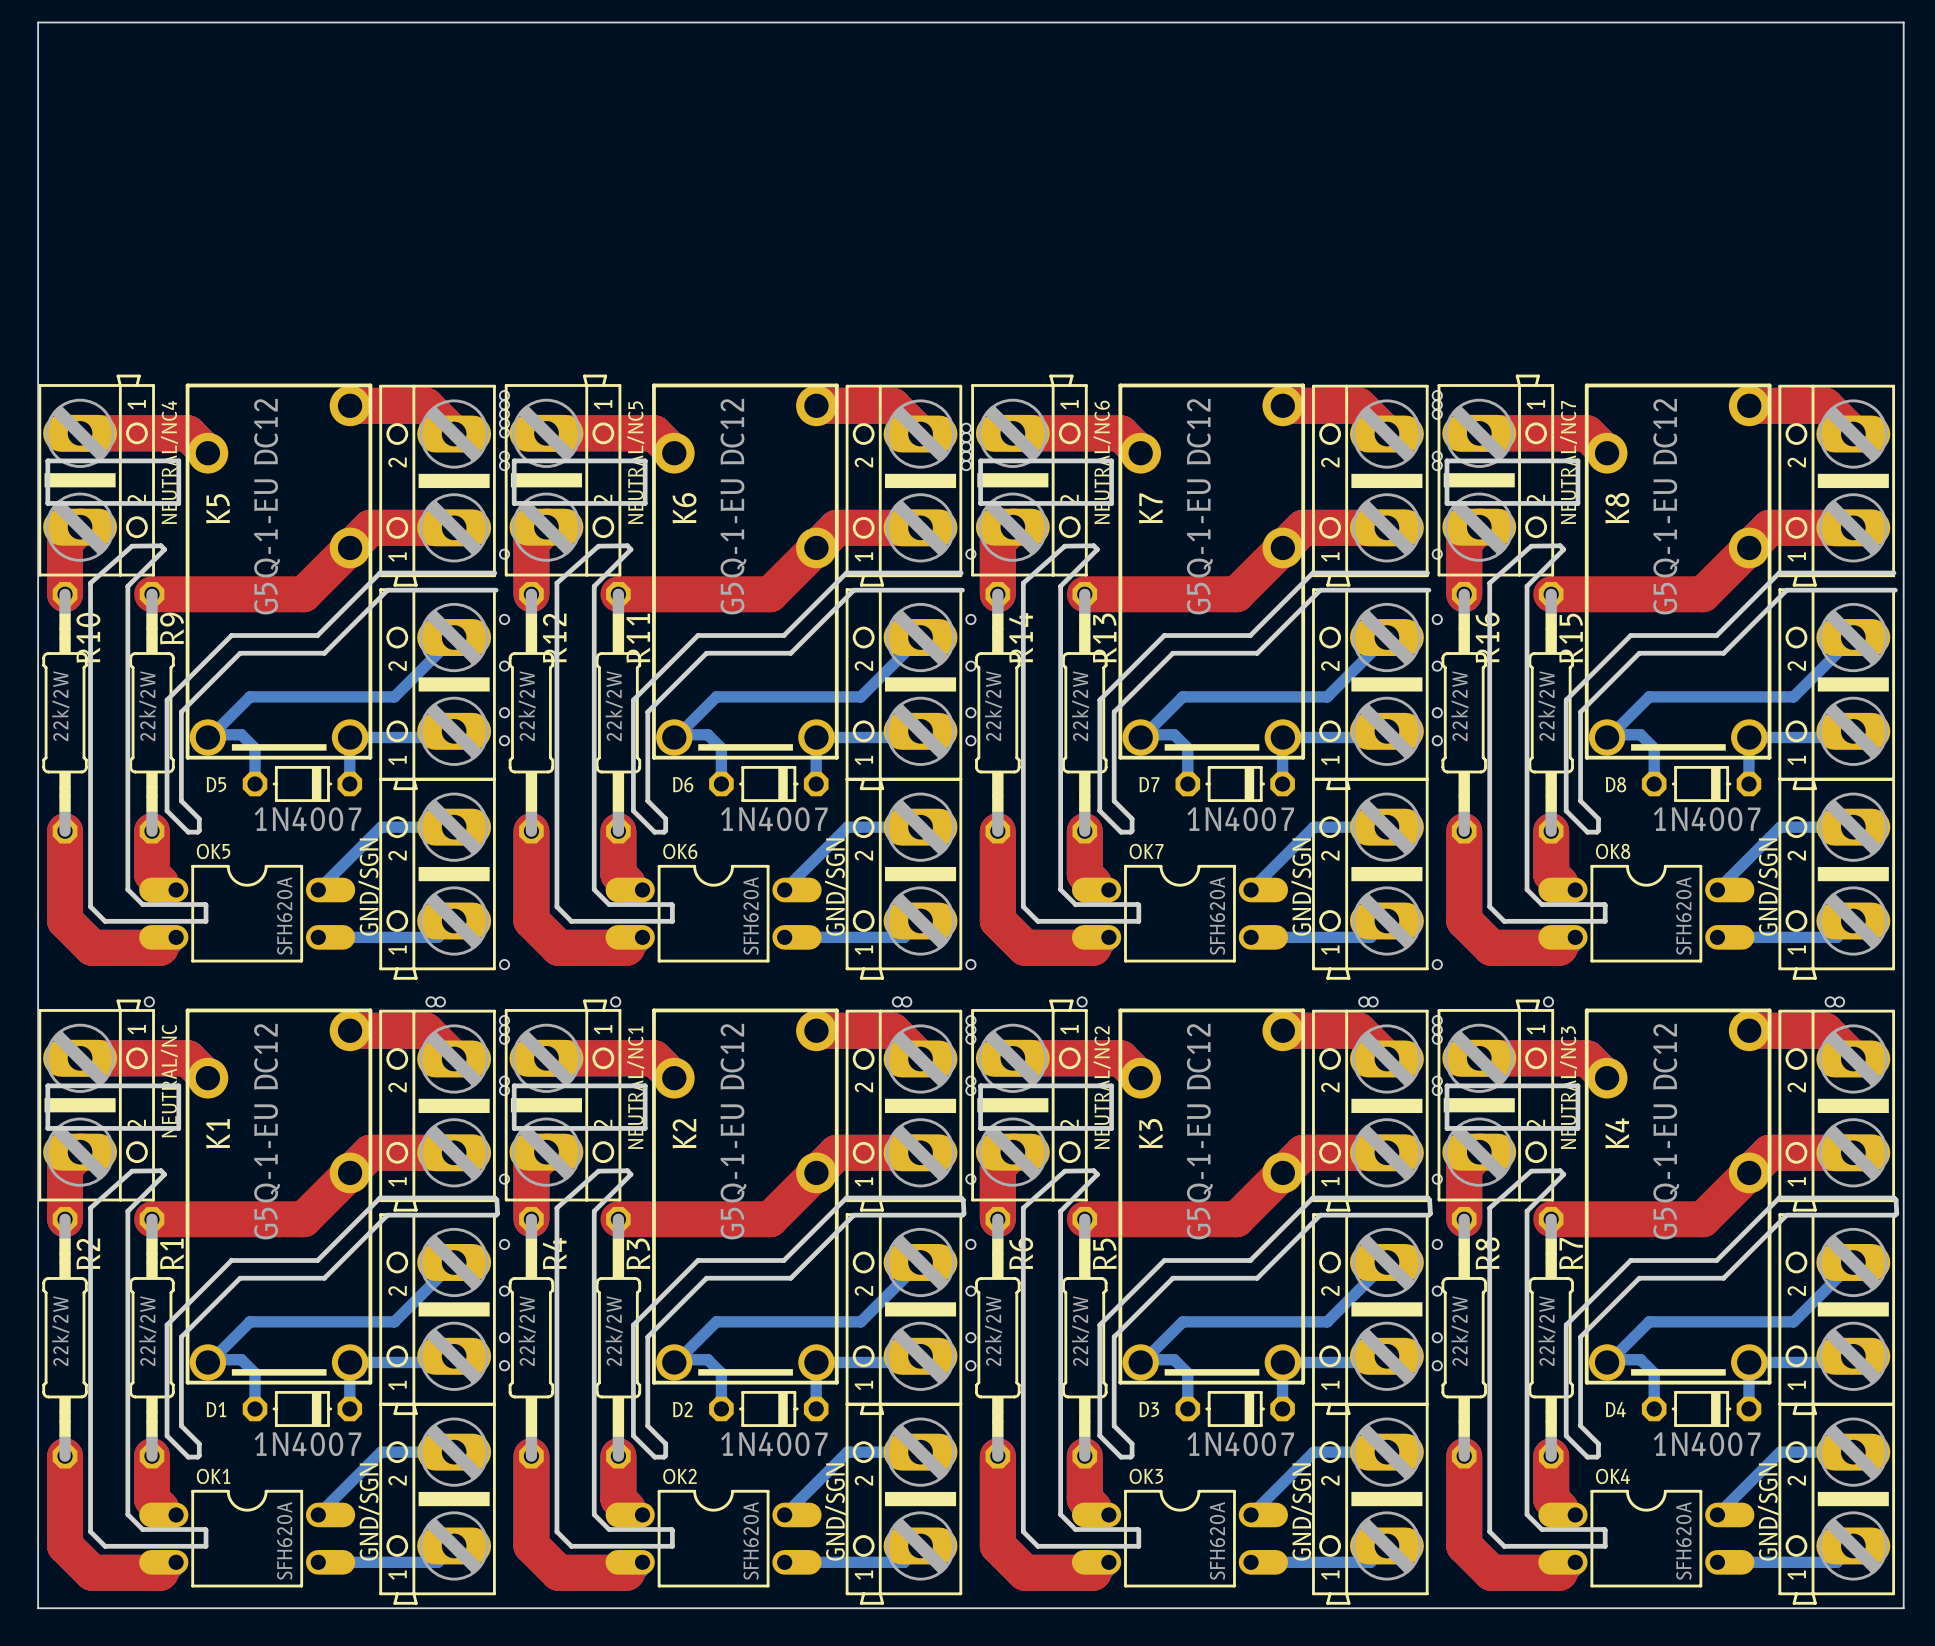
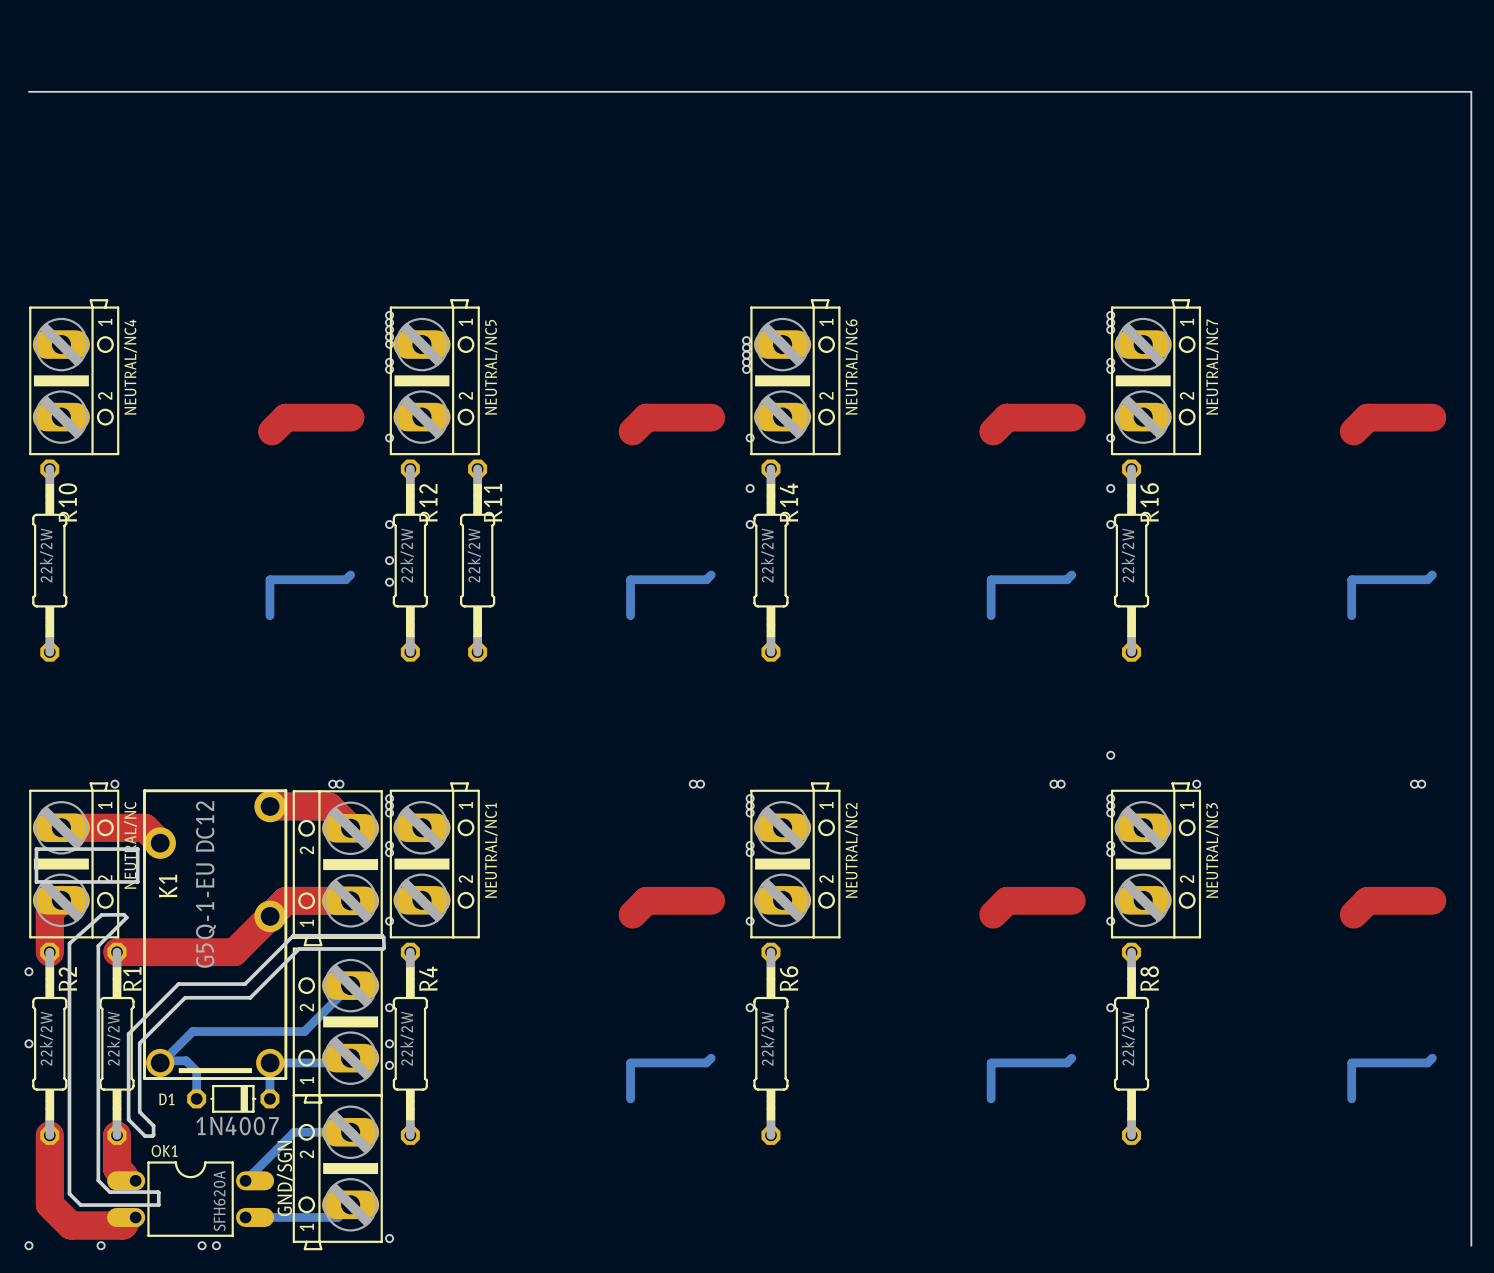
board edge: (1903, 106) (1903, 22) (38, 22) (38, 1608) (1903, 1608) (1903, 1598) -> (1471, 91) (28, 91)
top track: (350, 405) (426, 405) (454, 433) -> none
top track: (816, 405) (892, 405) (920, 433) -> none
top track: (1282, 405) (1358, 405) (1386, 433) -> none
top track: (1749, 405) (1825, 405) (1853, 433) -> none
top track: (80, 433) (187, 433) (206, 452) -> none
top track: (546, 433) (654, 433) (673, 452) -> none
top track: (1012, 433) (1120, 433) (1139, 452) -> none
top track: (1479, 433) (1586, 433) (1606, 452) -> none
board edge: (47, 460) (47, 503) (178, 503) (178, 460) (47, 460) -> none
board edge: (514, 460) (514, 503) (645, 503) (645, 460) (514, 460) -> none
board edge: (980, 460) (980, 503) (1111, 503) (1111, 460) (980, 460) -> none
board edge: (1446, 460) (1446, 503) (1577, 503) (1577, 460) (1446, 460) -> none
part: (437, 485) -> none
part: (903, 485) -> none
part: (1370, 485) -> none
part: (1836, 485) -> none
top track: (81, 526) (65, 542) (65, 594) -> none
top track: (547, 526) (531, 542) (531, 594) -> none
top track: (1013, 526) (997, 542) (997, 594) -> none
top track: (1480, 526) (1464, 542) (1464, 594) -> none
board edge: (161, 545) (132, 546) (90, 583) (90, 906) (105, 921) (206, 921) (205, 904) (142, 904) (127, 889) (127, 586) (164, 549) (161, 545) -> none
board edge: (627, 545) (598, 546) (556, 583) (556, 906) (571, 921) (672, 921) (671, 904) (609, 904) (594, 889) (594, 586) (630, 549) (627, 545) -> none
board edge: (1093, 545) (1064, 546) (1023, 583) (1023, 906) (1037, 921) (1138, 921) (1138, 904) (1075, 904) (1060, 889) (1060, 586) (1097, 549) (1093, 545) -> none
board edge: (1560, 545) (1531, 546) (1489, 583) (1489, 906) (1504, 921) (1605, 921) (1604, 904) (1541, 904) (1527, 889) (1527, 586) (1563, 549) (1560, 545) -> none
top track: (350, 547) (303, 594) (152, 594) -> none
top track: (816, 547) (770, 594) (618, 594) -> none
top track: (1282, 547) (1236, 594) (1084, 594) -> none
top track: (1749, 547) (1702, 594) (1551, 594) -> none
K5: G5Q-1-EU DC12 (278, 571) -> none
K6: G5Q-1-EU DC12 (745, 571) -> none
K7: G5Q-1-EU DC12 (1211, 571) -> none
K8: G5Q-1-EU DC12 (1678, 571) -> none
board edge: (494, 573) (380, 573) (317, 635) (231, 635) (167, 700) (167, 810) (188, 832) (199, 830) (199, 818) (181, 800) (181, 712) (240, 653) (324, 653) (387, 590) (496, 590) -> none
board edge: (961, 573) (846, 573) (783, 635) (697, 635) (633, 700) (633, 810) (654, 832) (665, 830) (665, 818) (647, 800) (647, 712) (706, 653) (790, 653) (853, 590) (962, 590) -> none
board edge: (1427, 573) (1312, 573) (1250, 635) (1164, 635) (1099, 700) (1099, 810) (1121, 832) (1132, 830) (1132, 818) (1114, 800) (1114, 712) (1172, 653) (1257, 653) (1320, 590) (1428, 590) -> none
board edge: (1893, 573) (1779, 573) (1716, 635) (1630, 635) (1566, 700) (1566, 810) (1587, 832) (1598, 830) (1598, 818) (1580, 800) (1580, 712) (1639, 653) (1723, 653) (1786, 590) (1895, 590) -> none
hole: (504, 619) -> none
bottom track: (453, 637) (394, 696) (250, 696) (218, 728) (218, 734) -> none
bottom track: (920, 637) (860, 696) (716, 696) (685, 728) (685, 734) -> none
bottom track: (1386, 637) (1327, 696) (1182, 696) (1151, 728) (1151, 734) -> none
bottom track: (1852, 637) (1793, 696) (1649, 696) (1617, 728) (1617, 734) -> none
part: (437, 689) -> none
part: (903, 689) -> none
part: (1370, 689) -> none
part: (1836, 689) -> none
R9: 22k/2W (152, 712) -> none
hole: (970, 712) -> none
R13: 22k/2W (1084, 712) -> none
hole: (1437, 712) -> none
R15: 22k/2W (1551, 712) -> none
bottom track: (207, 737) (210, 734) (241, 734) (255, 748) (255, 784) -> none
bottom track: (674, 737) (677, 734) (707, 734) (721, 748) (721, 784) -> none
bottom track: (1140, 737) (1143, 734) (1174, 734) (1187, 748) (1187, 784) -> none
bottom track: (1607, 737) (1609, 734) (1640, 734) (1654, 748) (1654, 784) -> none
hole: (970, 740) -> none
hole: (1437, 740) -> none
D5: 1N4007 (302, 784) -> none
D6: 1N4007 (768, 784) -> none
D7: 1N4007 (1235, 784) -> none
D8: 1N4007 (1701, 784) -> none
bottom track: (454, 827) (381, 827) (318, 889) -> none
bottom track: (920, 827) (847, 827) (784, 889) -> none
bottom track: (1386, 827) (1313, 827) (1251, 889) -> none
bottom track: (1853, 827) (1780, 827) (1717, 889) -> none
top track: (65, 831) (65, 920) (92, 947) (160, 947) (164, 946) (174, 937) -> none
top track: (152, 831) (152, 874) (161, 883) (169, 883) (176, 889) -> none
top track: (531, 831) (531, 920) (558, 947) (626, 947) (631, 946) (640, 937) -> none
top track: (618, 831) (618, 874) (627, 883) (636, 883) (642, 889) -> none
top track: (997, 831) (997, 920) (1025, 947) (1093, 947) (1097, 946) (1107, 937) -> none
top track: (1084, 831) (1084, 874) (1094, 883) (1102, 883) (1108, 889) -> none
top track: (1464, 831) (1464, 920) (1491, 947) (1559, 947) (1564, 946) (1573, 937) -> none
top track: (1551, 831) (1551, 874) (1560, 883) (1568, 883) (1575, 889) -> none
part: (437, 878) -> none
part: (903, 878) -> none
part: (1370, 878) -> none
part: (1836, 878) -> none
text: GND/SGN (369, 887) -> none
text: GND/SGN (835, 887) -> none
text: GND/SGN (1301, 887) -> none
text: GND/SGN (1768, 887) -> none
OK5: SFH620A (247, 913) -> none
OK6: SFH620A (713, 913) -> none
OK7: SFH620A (1179, 913) -> none
OK8: SFH620A (1646, 913) -> none
bottom track: (454, 921) (437, 937) (318, 937) -> none
bottom track: (920, 921) (904, 937) (784, 937) -> none
bottom track: (1386, 921) (1370, 937) (1251, 937) -> none
bottom track: (1853, 921) (1836, 937) (1717, 937) -> none
hole: (504, 964) -> none
hole: (970, 964) -> none
hole: (615, 1001) -> none
hole: (1082, 1001) -> none
top track: (816, 1030) (892, 1030) (920, 1058) -> none
top track: (1282, 1030) (1358, 1030) (1386, 1058) -> none
top track: (1749, 1030) (1825, 1030) (1853, 1058) -> none
top track: (546, 1058) (654, 1058) (673, 1077) -> none
top track: (1012, 1058) (1120, 1058) (1139, 1077) -> none
top track: (1479, 1058) (1586, 1058) (1606, 1077) -> none
board edge: (514, 1085) (645, 1085) (645, 1128) (514, 1128) (514, 1085) -> none
board edge: (980, 1085) (1111, 1085) (1111, 1128) (980, 1128) (980, 1085) -> none
board edge: (1446, 1085) (1577, 1085) (1577, 1128) (1446, 1128) (1446, 1085) -> none
part: (903, 1110) -> none
part: (1370, 1110) -> none
part: (1836, 1110) -> none
top track: (547, 1151) (531, 1167) (531, 1219) -> none
top track: (1013, 1151) (997, 1167) (997, 1219) -> none
top track: (1480, 1151) (1464, 1167) (1464, 1219) -> none
board edge: (627, 1170) (598, 1171) (556, 1208) (556, 1531) (571, 1546) (672, 1546) (671, 1529) (609, 1529) (594, 1514) (594, 1211) (630, 1174) (627, 1170) -> none
board edge: (1093, 1170) (1064, 1171) (1023, 1208) (1023, 1531) (1037, 1546) (1138, 1546) (1138, 1529) (1075, 1529) (1060, 1514) (1060, 1211) (1097, 1174) (1093, 1170) -> none
board edge: (1560, 1170) (1531, 1171) (1489, 1208) (1489, 1531) (1504, 1546) (1605, 1546) (1604, 1529) (1541, 1529) (1527, 1514) (1527, 1211) (1563, 1174) (1560, 1170) -> none
top track: (816, 1172) (770, 1219) (618, 1219) -> none
top track: (1282, 1172) (1236, 1219) (1084, 1219) -> none
top track: (1749, 1172) (1702, 1219) (1551, 1219) -> none
K2: G5Q-1-EU DC12 (745, 1196) -> none
K3: G5Q-1-EU DC12 (1211, 1196) -> none
K4: G5Q-1-EU DC12 (1678, 1196) -> none
board edge: (961, 1197) (963, 1200) (962, 1215) (853, 1215) (790, 1278) (706, 1278) (647, 1336) (647, 1425) (665, 1443) (665, 1455) (654, 1457) (633, 1435) (633, 1325) (697, 1260) (783, 1260) (846, 1197) (961, 1197) -> none
board edge: (1427, 1197) (1429, 1200) (1428, 1215) (1320, 1215) (1257, 1278) (1172, 1278) (1114, 1336) (1114, 1425) (1132, 1443) (1132, 1455) (1121, 1457) (1099, 1435) (1099, 1325) (1164, 1260) (1250, 1260) (1312, 1197) (1427, 1197) -> none
board edge: (1893, 1197) (1896, 1200) (1895, 1215) (1786, 1215) (1723, 1278) (1639, 1278) (1580, 1336) (1580, 1425) (1598, 1443) (1598, 1455) (1587, 1457) (1566, 1435) (1566, 1325) (1630, 1260) (1716, 1260) (1779, 1197) (1894, 1197) -> none
hole: none -> (28, 971)
hole: (504, 1244) -> none
hole: (970, 1244) -> none
hole: (1437, 1244) -> none
bottom track: (920, 1262) (860, 1321) (716, 1321) (685, 1353) (685, 1359) -> none
bottom track: (1386, 1262) (1327, 1321) (1182, 1321) (1151, 1353) (1151, 1359) -> none
bottom track: (1852, 1262) (1793, 1321) (1649, 1321) (1617, 1353) (1617, 1359) -> none
part: (903, 1314) -> none
part: (1370, 1314) -> none
part: (1836, 1314) -> none
hole: none -> (28, 1043)
R3: 22k/2W (618, 1337) -> none
hole: (970, 1337) -> none
R5: 22k/2W (1084, 1337) -> none
hole: (1437, 1337) -> none
R7: 22k/2W (1551, 1337) -> none
bottom track: (674, 1362) (677, 1359) (707, 1359) (721, 1373) (721, 1408) -> none
bottom track: (1140, 1362) (1143, 1359) (1174, 1359) (1187, 1373) (1187, 1408) -> none
bottom track: (1607, 1362) (1609, 1359) (1640, 1359) (1654, 1373) (1654, 1408) -> none
hole: (970, 1365) -> none
hole: (1437, 1365) -> none
D2: 1N4007 (768, 1408) -> none
D3: 1N4007 (1235, 1408) -> none
D4: 1N4007 (1701, 1408) -> none
bottom track: (920, 1452) (847, 1452) (784, 1514) -> none
bottom track: (1386, 1452) (1313, 1452) (1251, 1514) -> none
bottom track: (1853, 1452) (1780, 1452) (1717, 1514) -> none
top track: (531, 1456) (531, 1545) (558, 1572) (626, 1572) (631, 1571) (640, 1562) -> none
top track: (618, 1456) (618, 1499) (627, 1508) (636, 1508) (642, 1514) -> none
top track: (997, 1456) (997, 1545) (1025, 1572) (1093, 1572) (1097, 1571) (1107, 1562) -> none
top track: (1084, 1456) (1084, 1499) (1094, 1508) (1102, 1508) (1108, 1514) -> none
top track: (1464, 1456) (1464, 1545) (1491, 1572) (1559, 1572) (1564, 1571) (1573, 1562) -> none
top track: (1551, 1456) (1551, 1499) (1560, 1508) (1568, 1508) (1575, 1514) -> none
part: (903, 1503) -> none
part: (1370, 1503) -> none
part: (1836, 1503) -> none
text: GND/SGN (835, 1512) -> none
text: GND/SGN (1301, 1512) -> none
text: GND/SGN (1768, 1512) -> none
OK2: SFH620A (713, 1538) -> none
OK3: SFH620A (1179, 1538) -> none
OK4: SFH620A (1646, 1538) -> none
bottom track: (920, 1545) (904, 1562) (784, 1562) -> none
bottom track: (1386, 1545) (1370, 1562) (1251, 1562) -> none
bottom track: (1853, 1545) (1836, 1562) (1717, 1562) -> none
hole: none -> (389, 1238)
hole: none -> (28, 1245)
hole: none -> (101, 1245)
hole: none -> (202, 1245)
hole: none -> (216, 1245)

